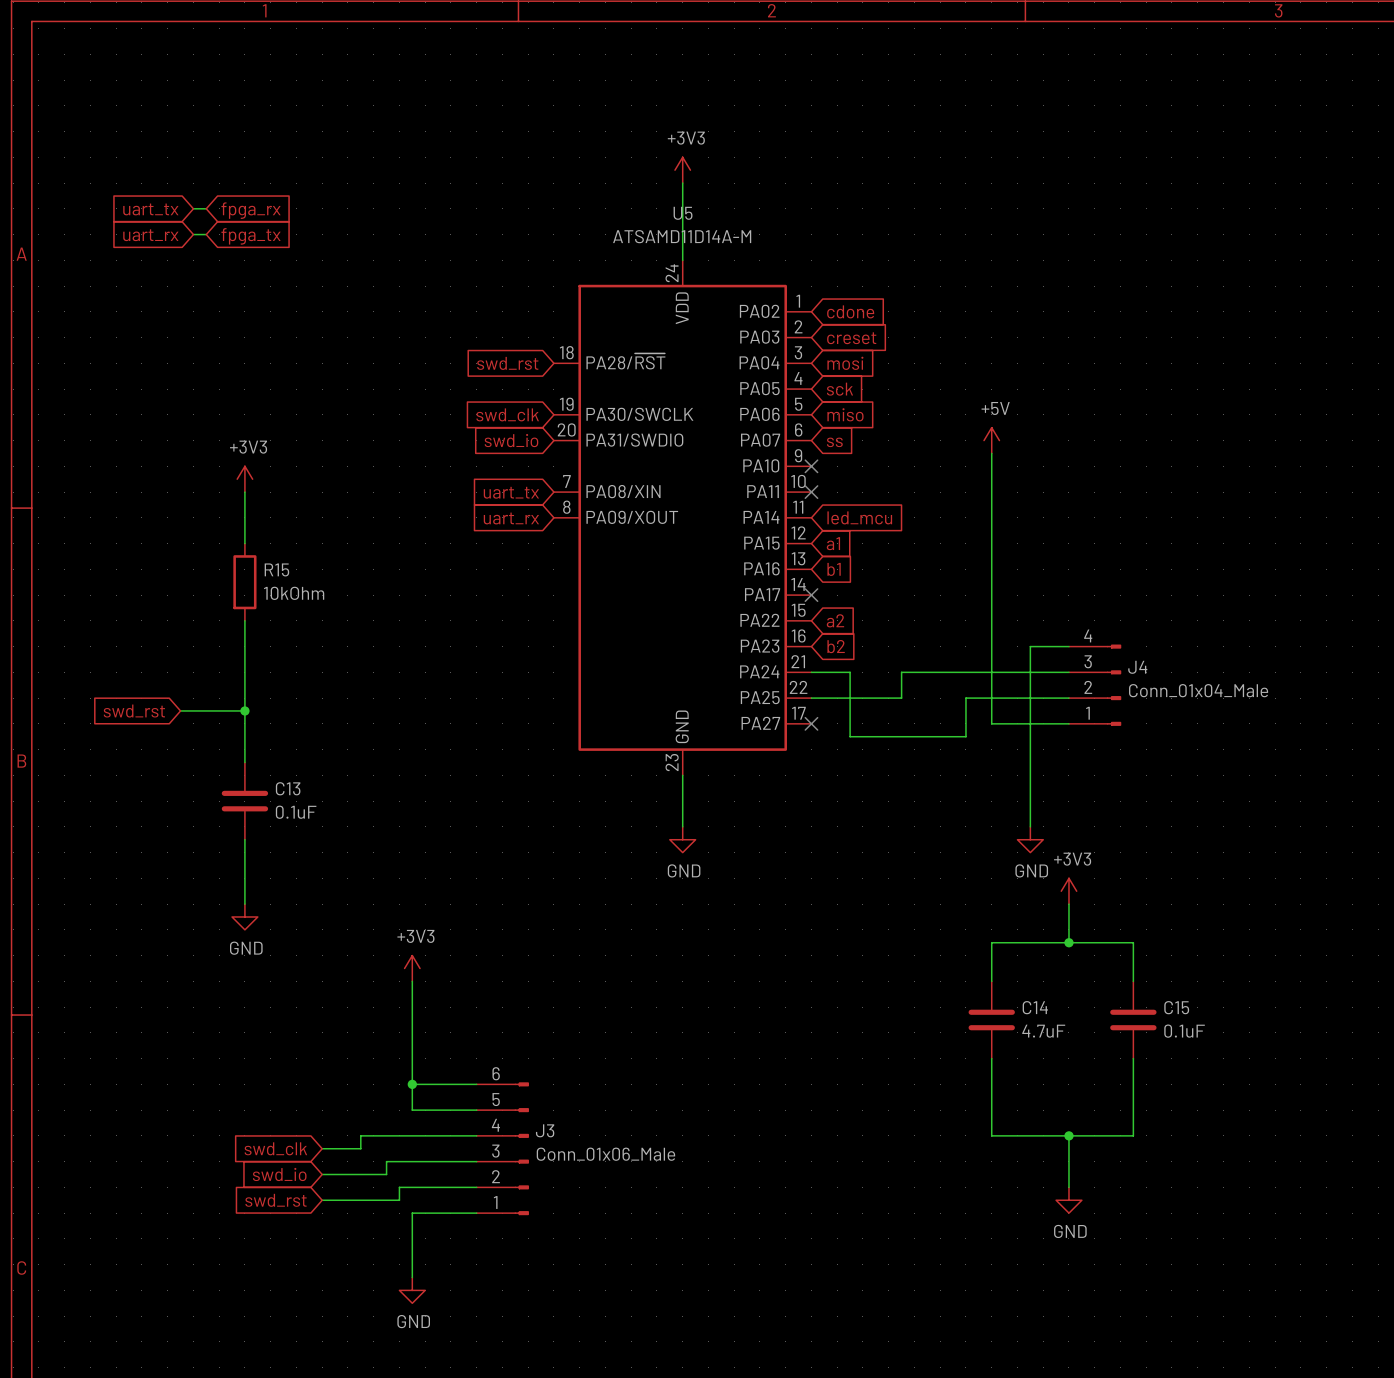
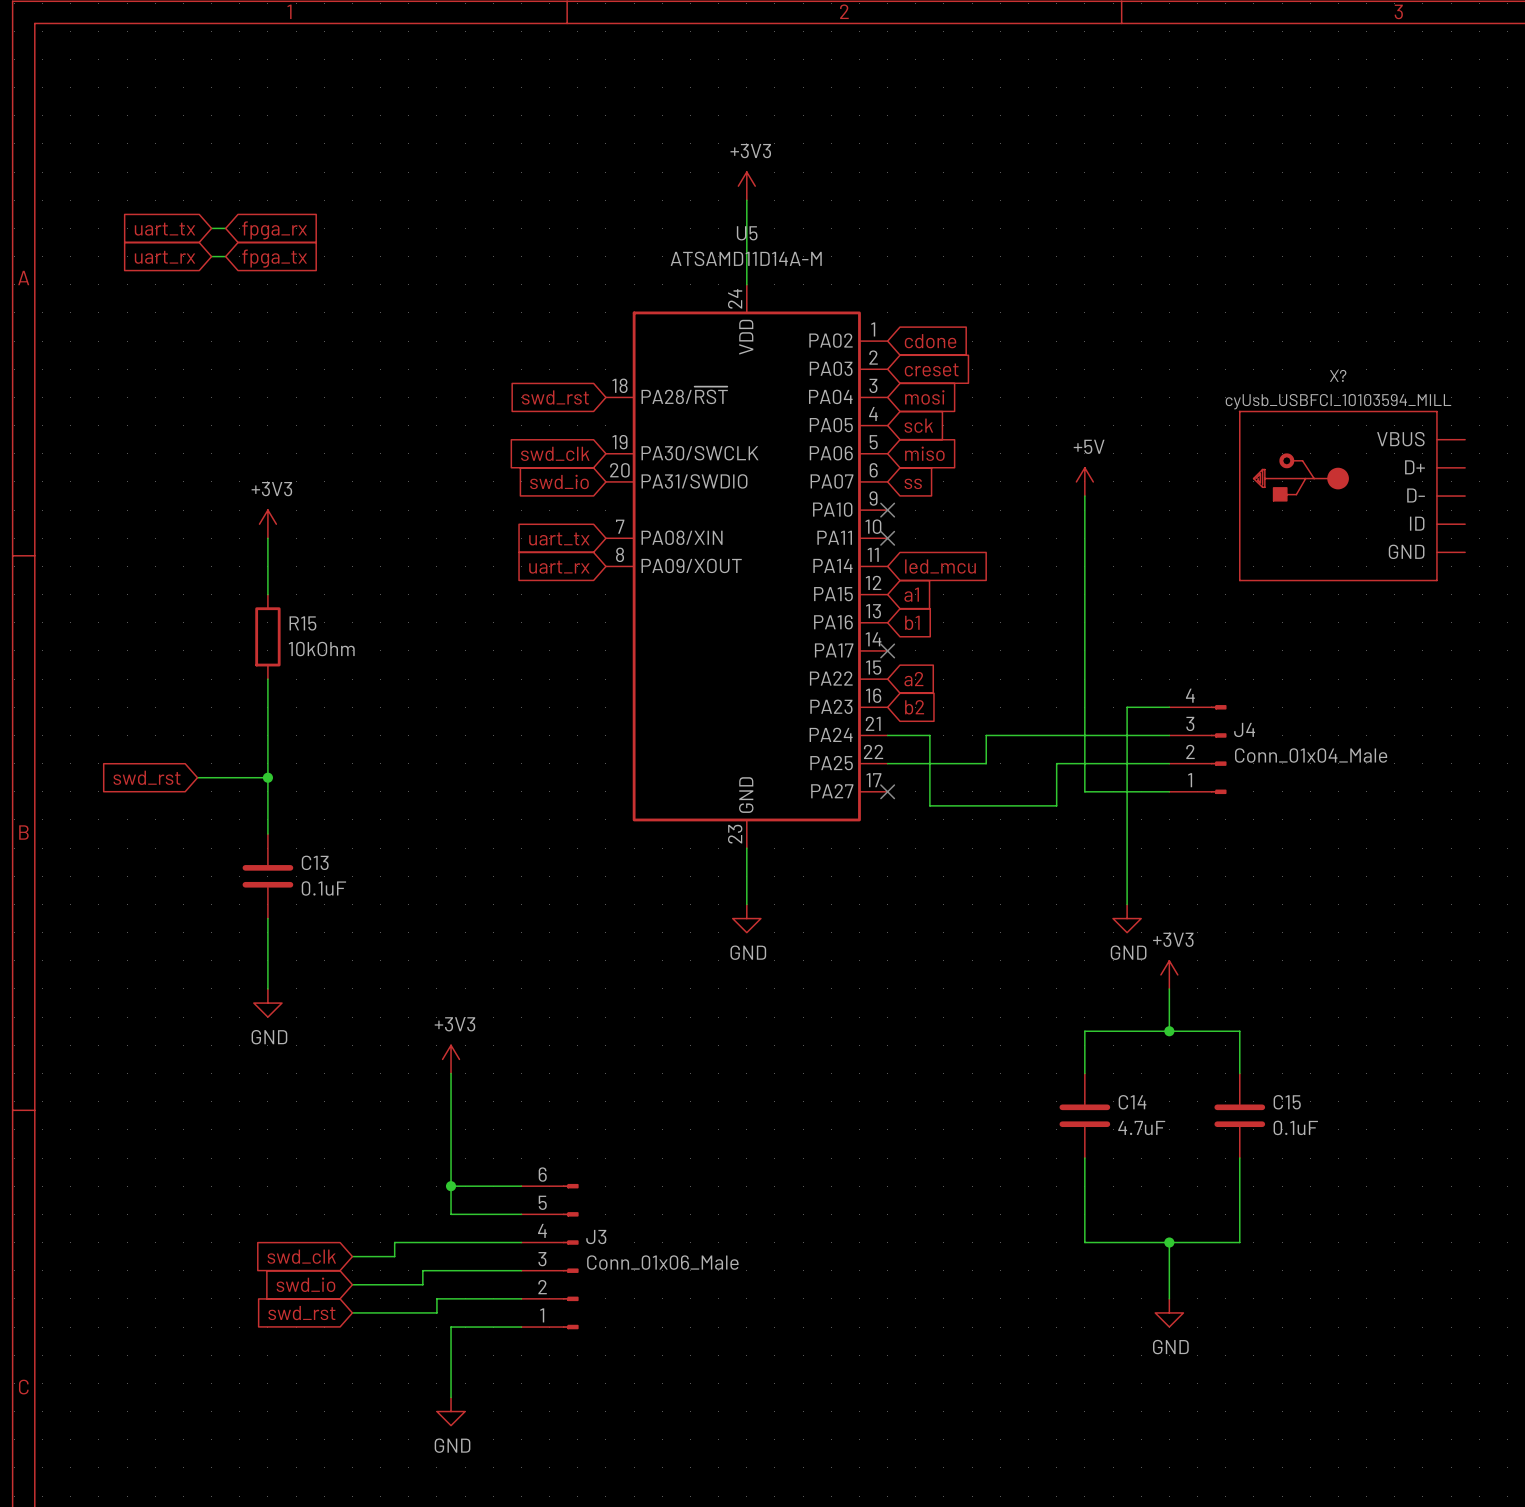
X?: none -> cyUsb_USBFCI_10103594_MILL (1352, 496)

